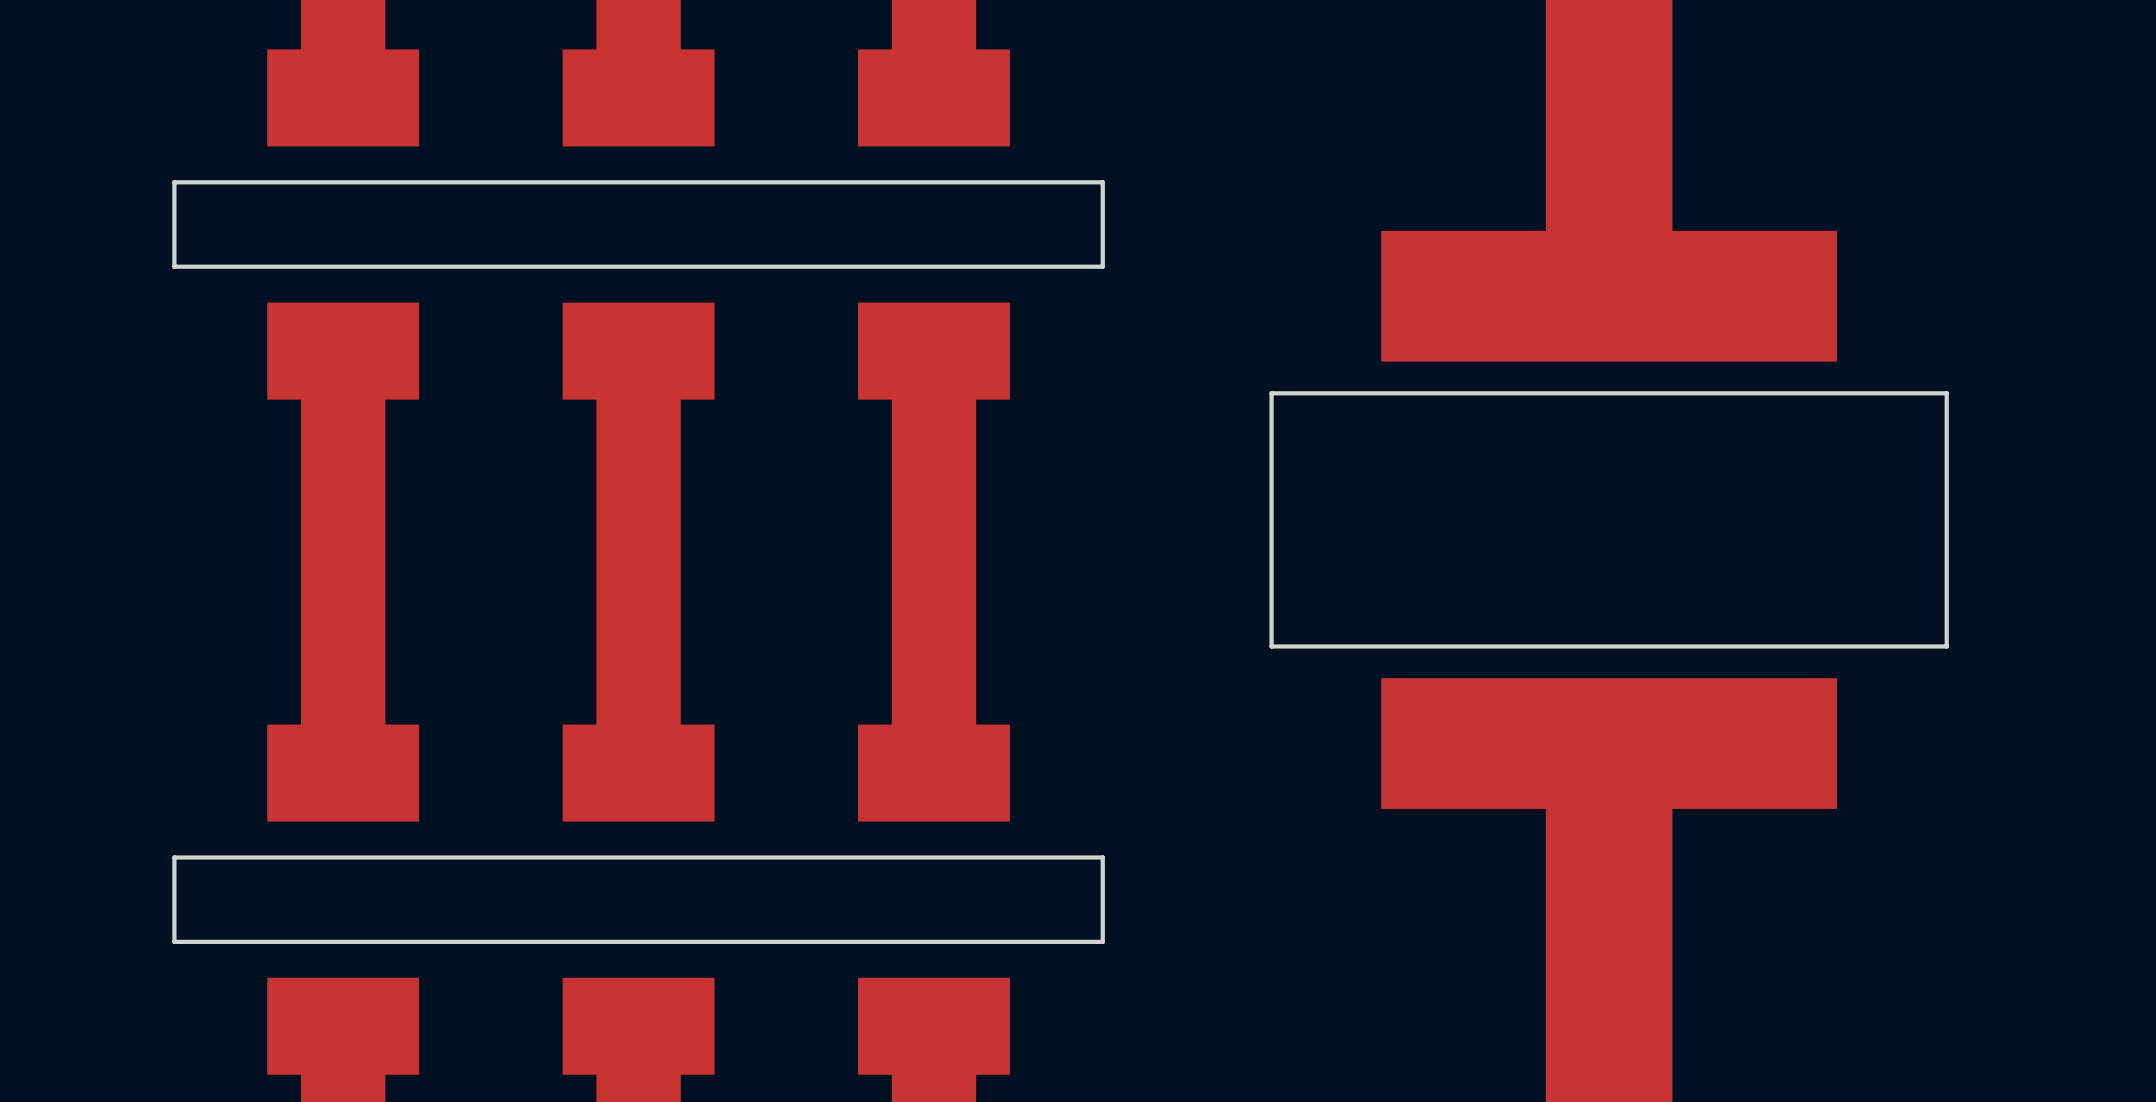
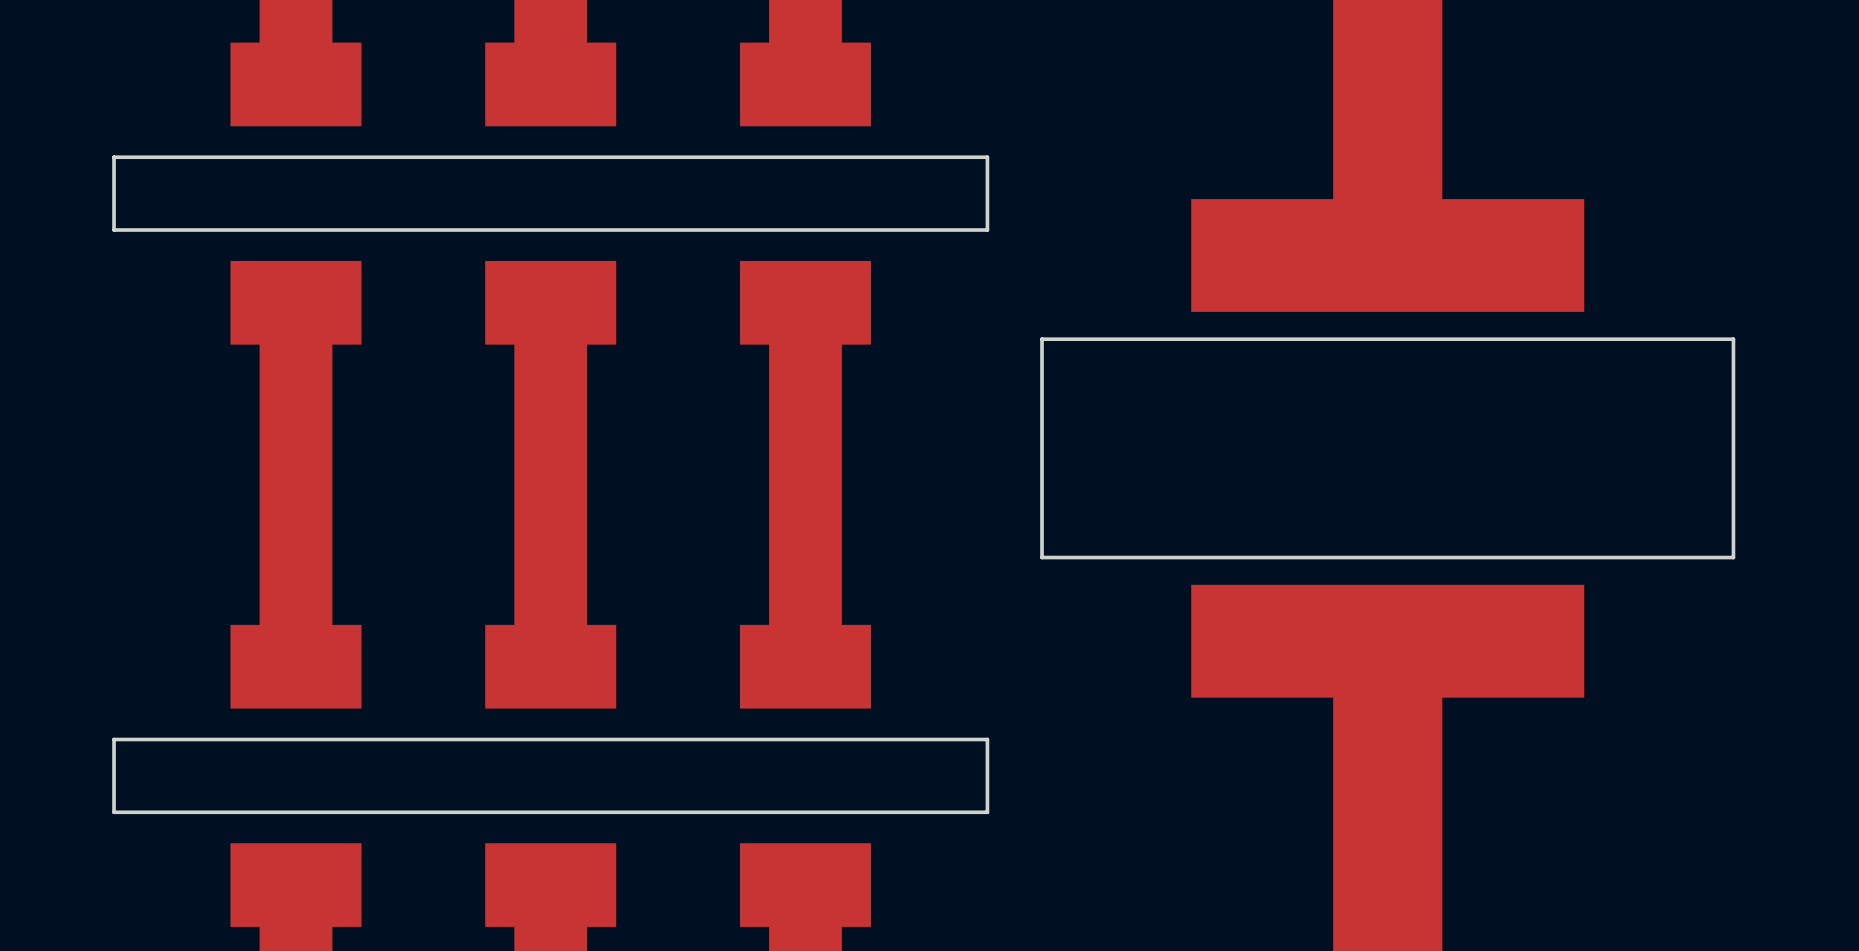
board edge: (174, 182) (174, 266) -> (150, 157) (114, 157) (114, 230) (150, 230)
board edge: (1102, 182) (1102, 266) -> (951, 157) (987, 157) (987, 230) (951, 230)
board edge: (1271, 393) (1271, 646) -> (1096, 339) (1042, 339) (1042, 557) (1096, 557)
board edge: (1946, 393) (1946, 646) -> (1678, 339) (1733, 339) (1733, 557) (1678, 557)
board edge: (174, 857) (174, 941) -> (150, 739) (114, 739) (114, 812) (150, 812)
board edge: (1102, 857) (1102, 941) -> (951, 739) (987, 739) (987, 812) (951, 812)

